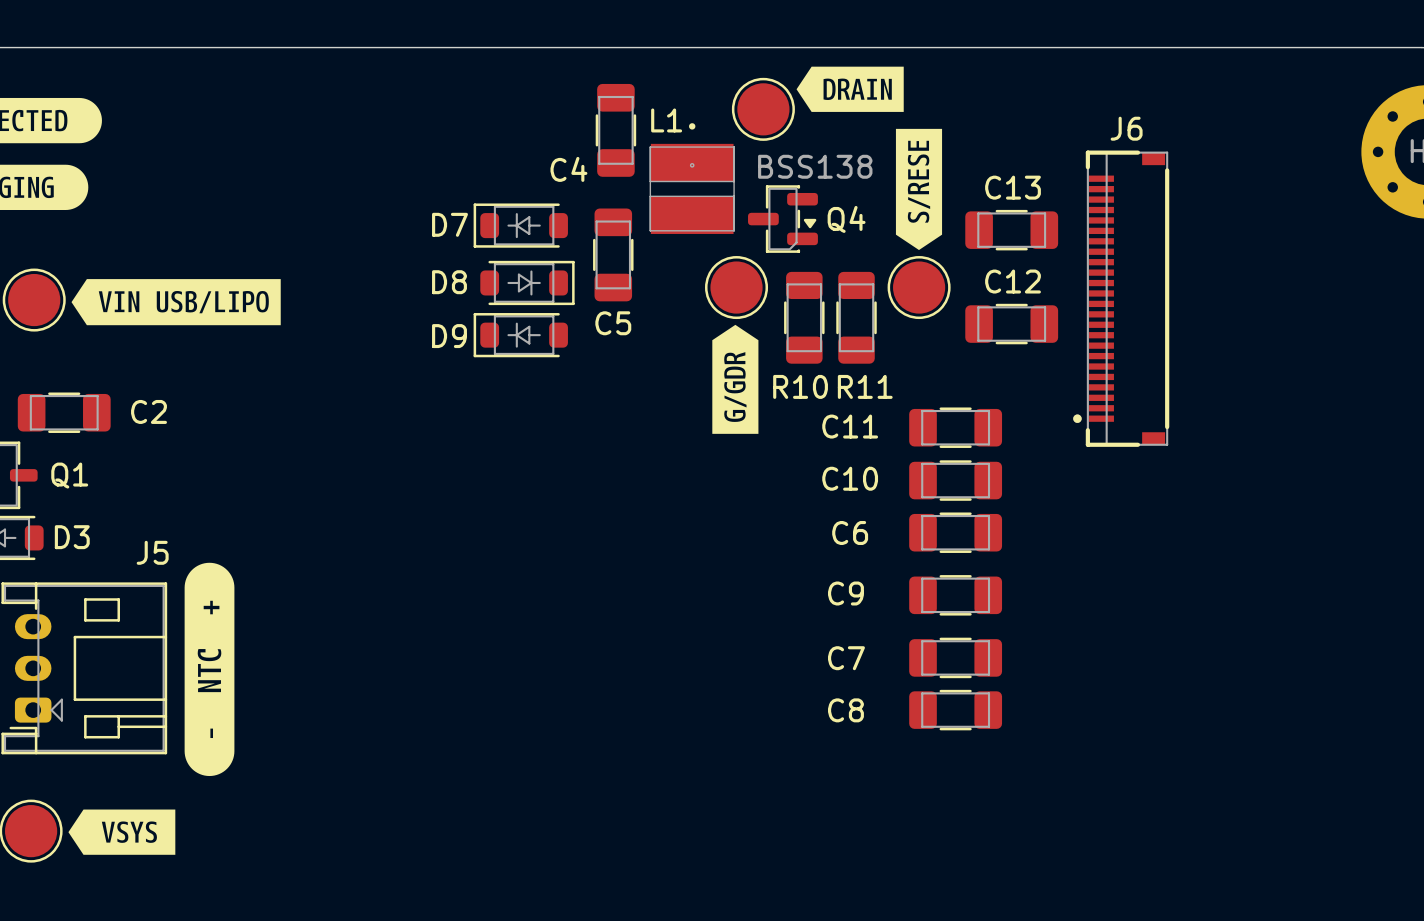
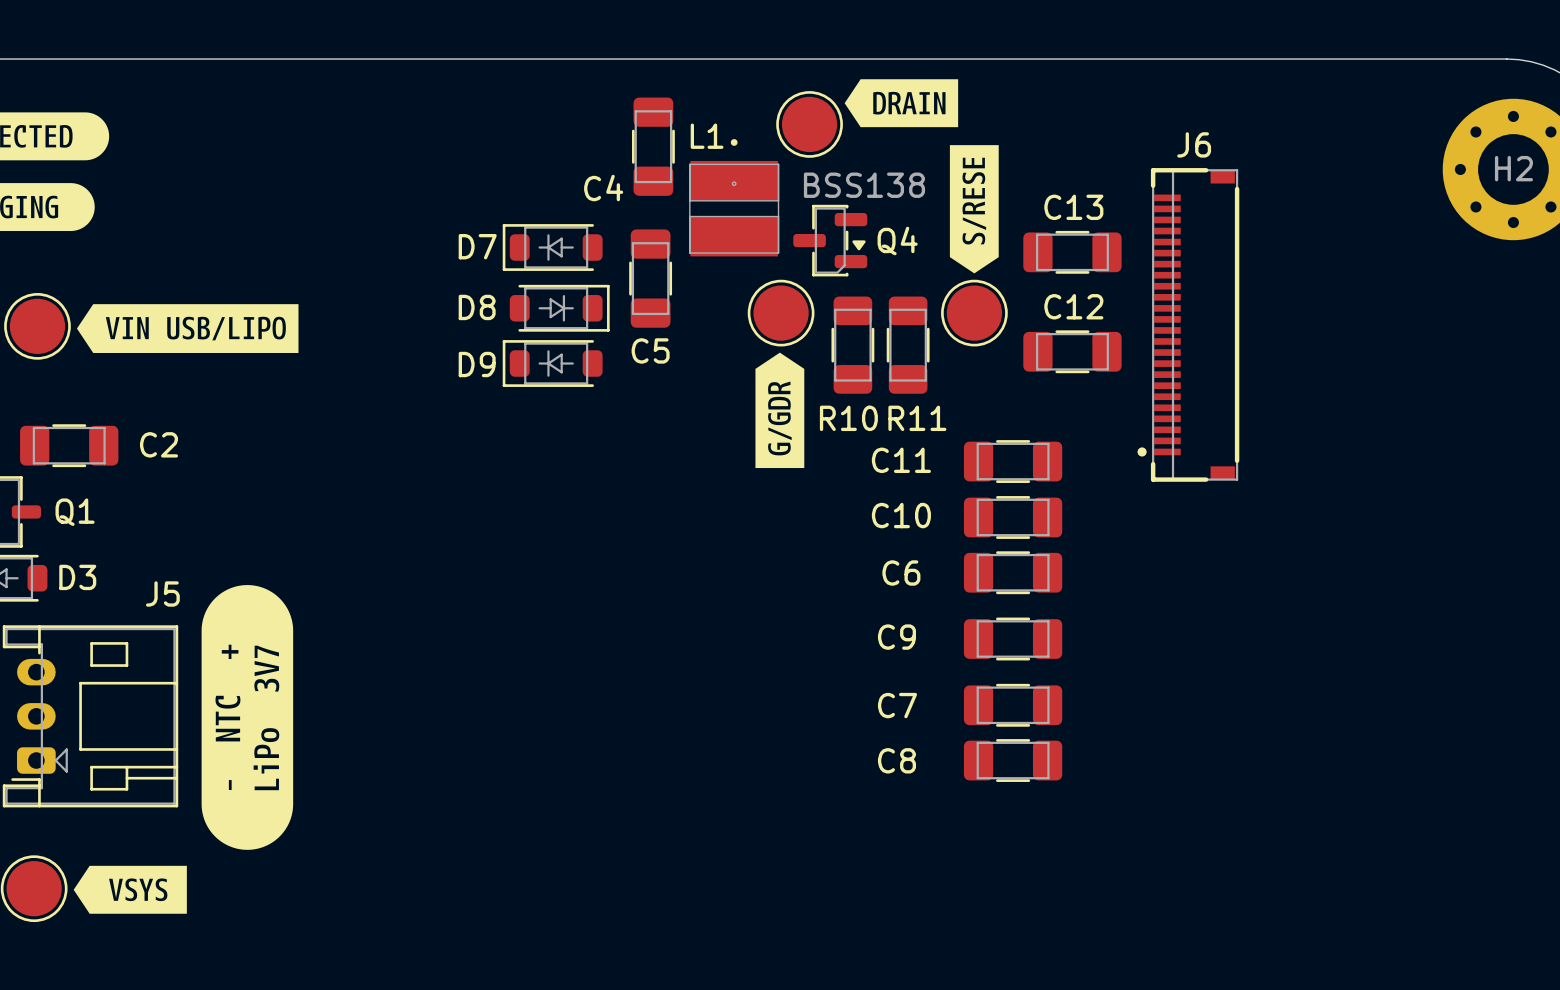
drawing: none -> [201, 585, 294, 850]
drawing: [184, 562, 235, 777] -> none

